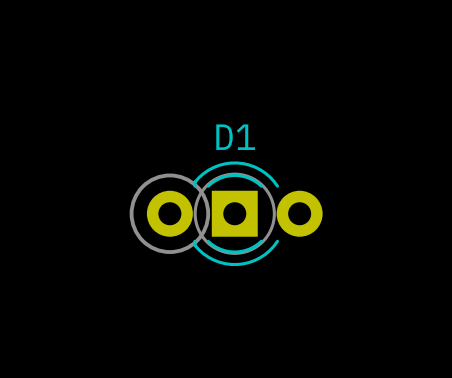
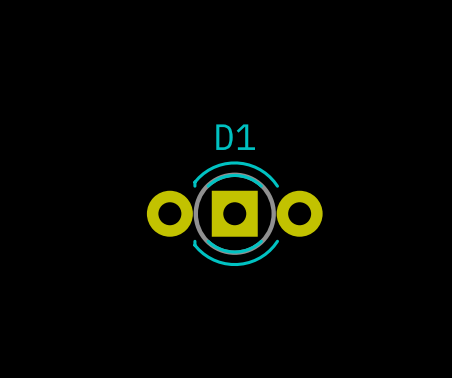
D1 footprint: [129, 161, 323, 267] -> [146, 161, 323, 267]

